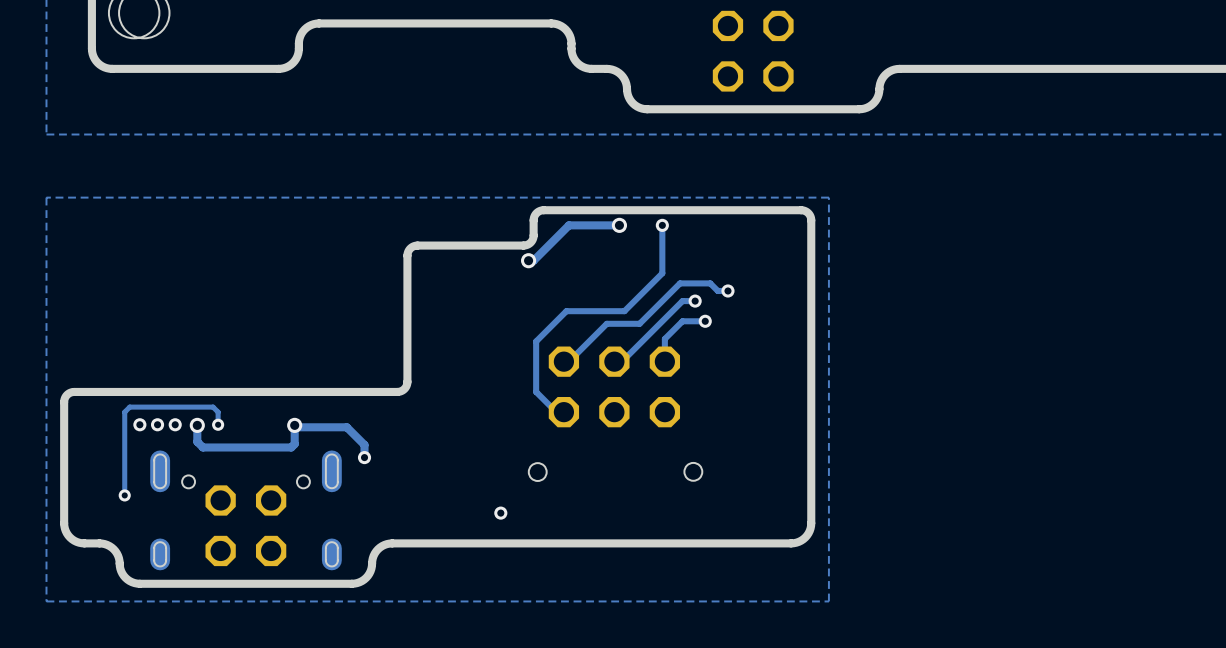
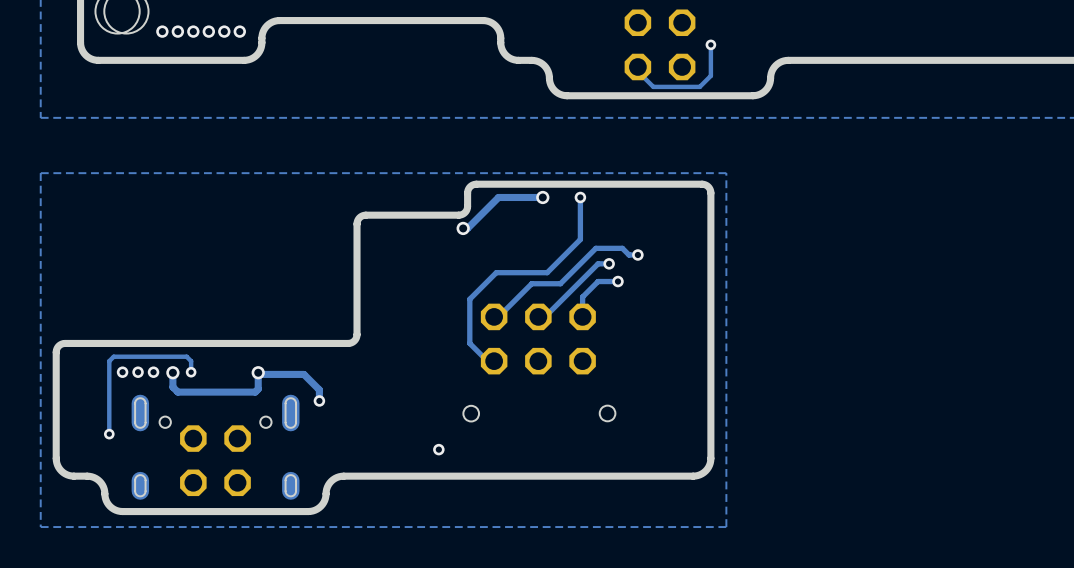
via: none -> (162, 31)
via: none -> (177, 31)
via: none -> (193, 31)
via: none -> (208, 31)
via: none -> (224, 31)
via: none -> (239, 31)
track: none -> (710, 44) (710, 75) (699, 86) (653, 86) (637, 71) (637, 66)
via: none -> (710, 44)

